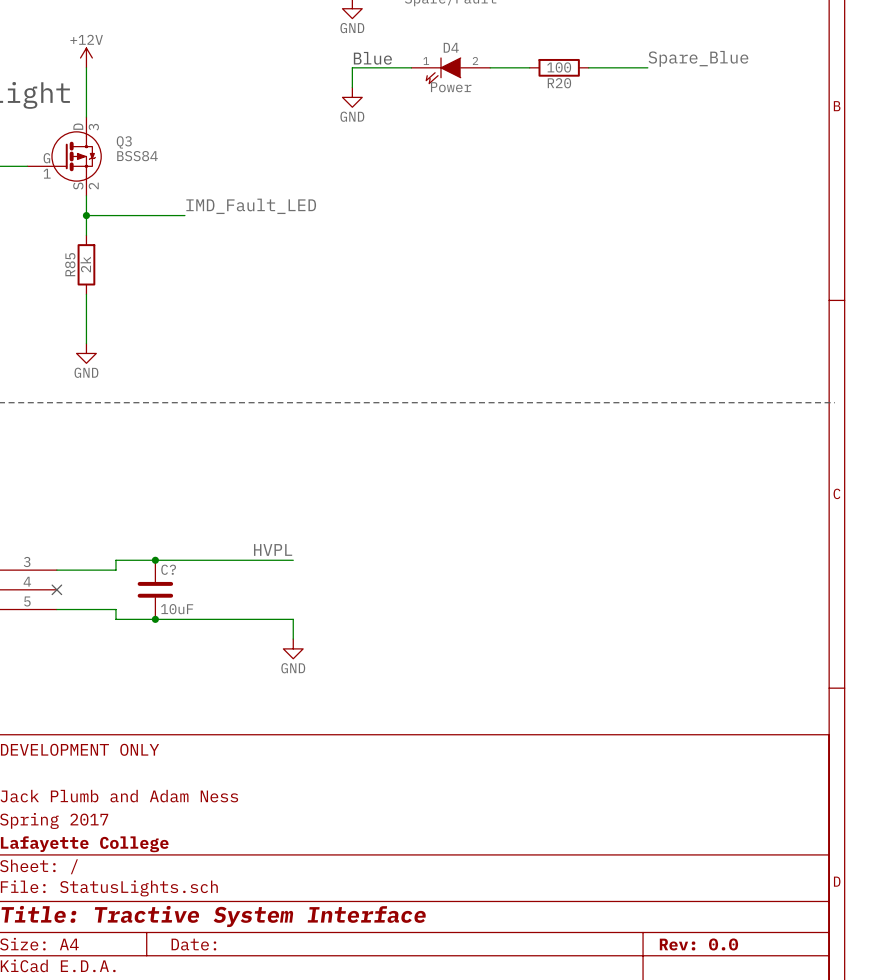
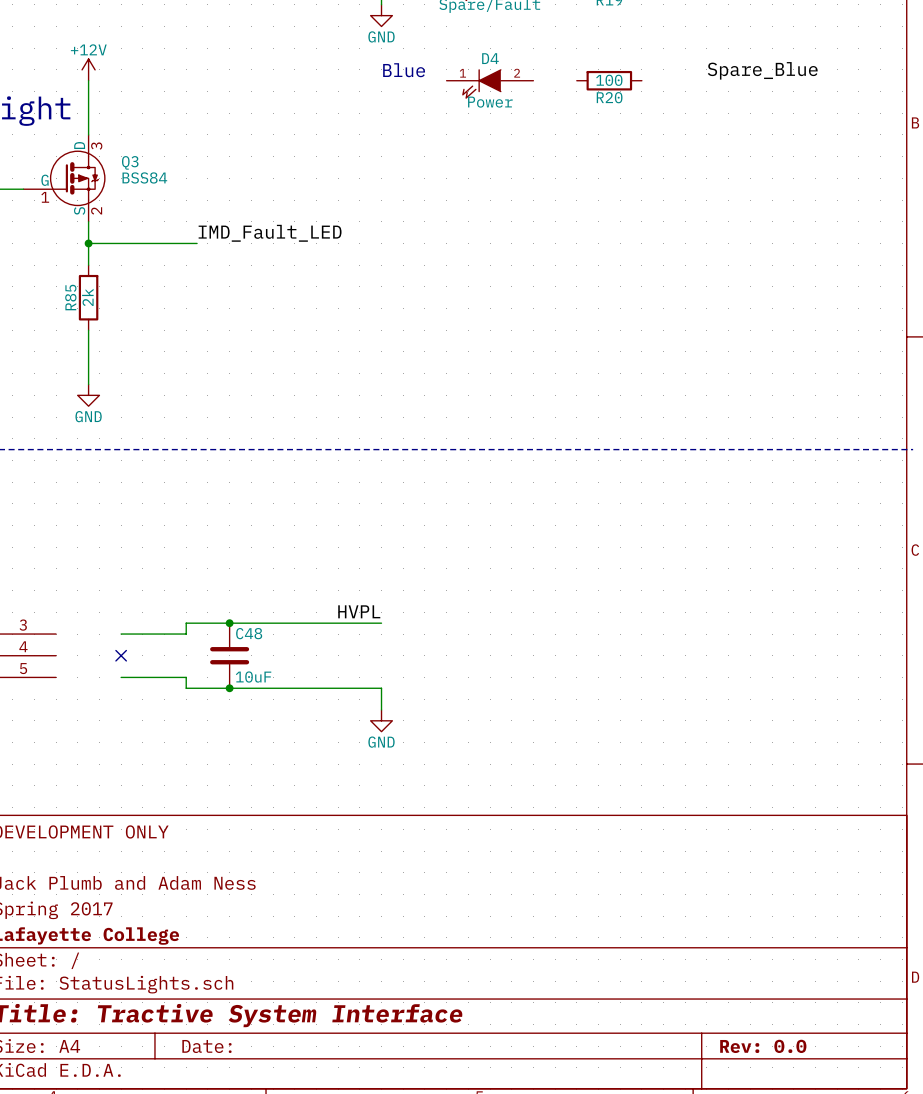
wire: (411, 67) (352, 67) (352, 87) -> none
wire: (490, 67) (529, 67) -> none
wire: (588, 67) (647, 67) -> none
power symbol: GND (352, 97) -> none
label position: HVPL (273, 549) -> HVPL (359, 611)
junction: (155, 560) -> none
wire: (175, 560) (115, 560) (115, 570) (56, 570) -> (186, 623) (186, 634) (121, 634)
junction: none -> (229, 623)
wire: none -> (316, 623) (381, 623)
no-connect mark: (56, 589) -> none
no-connect mark: none -> (121, 655)
C?: 10uF (155, 589) -> none
C48: none -> 10uF (229, 655)
wire: (56, 609) (115, 609) (115, 619) (175, 619) -> (121, 677) (186, 677) (186, 688)
junction: (155, 619) -> none
junction: none -> (229, 688)
wire: (293, 619) (293, 639) -> (316, 688) (381, 688) (381, 709)
power symbol position: GND (293, 648) -> GND (381, 720)

